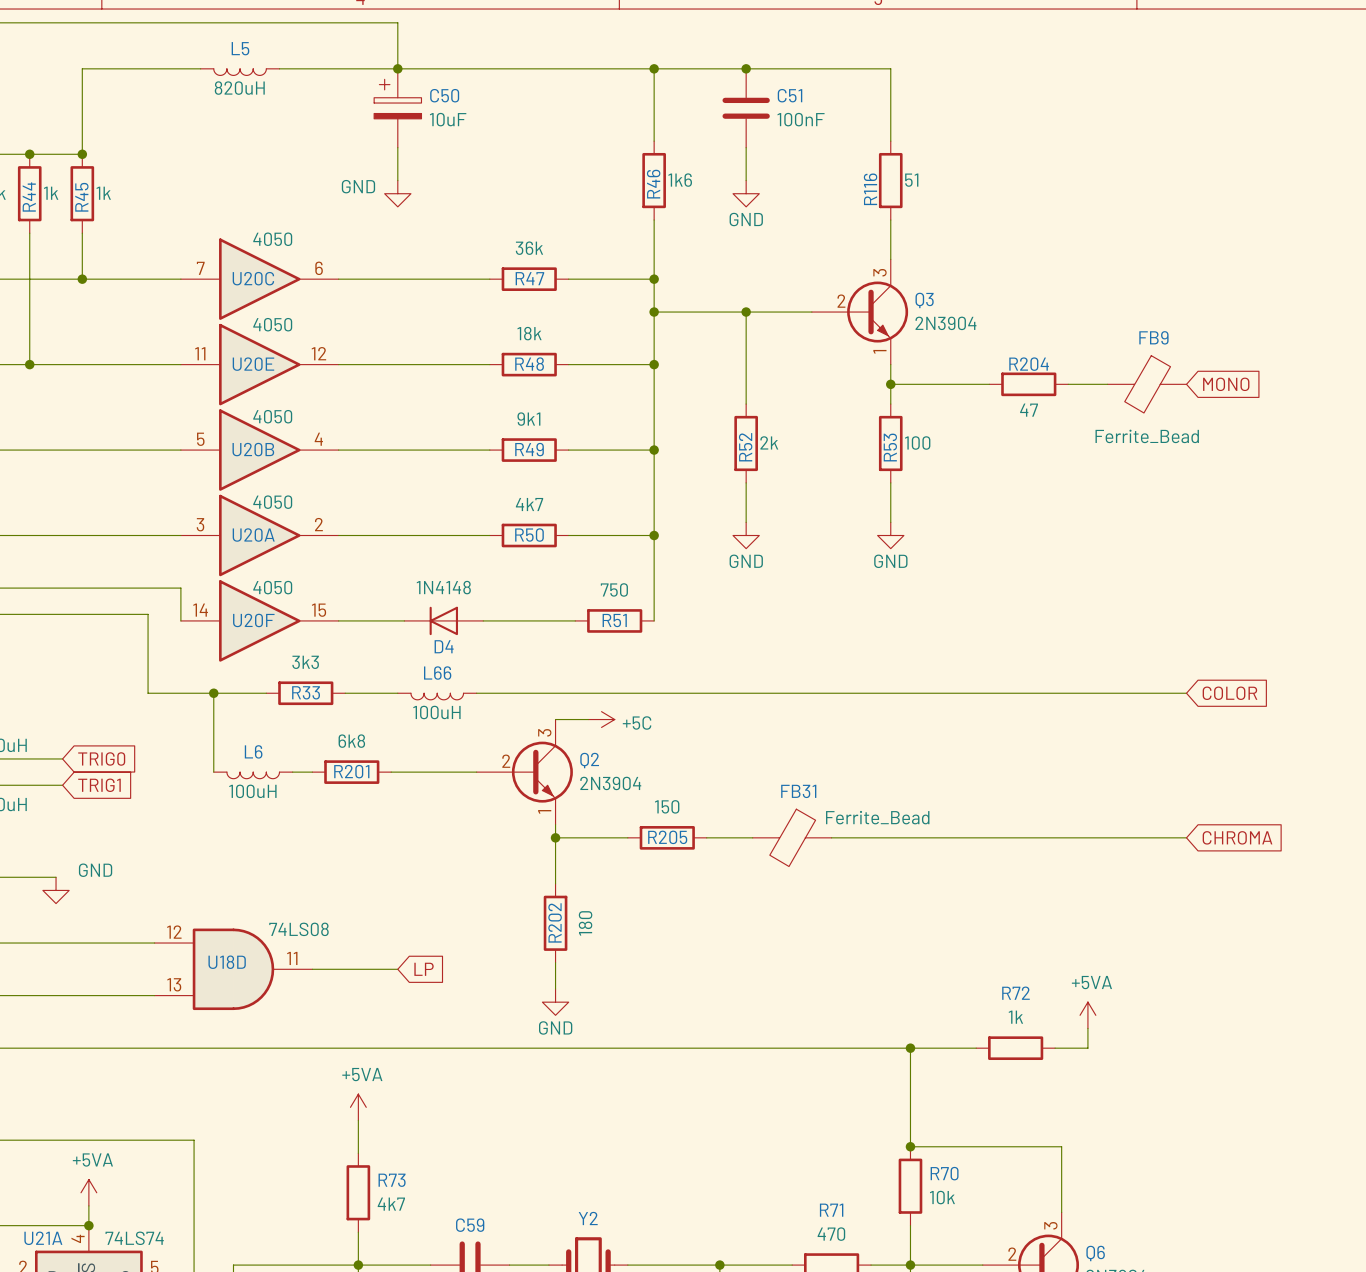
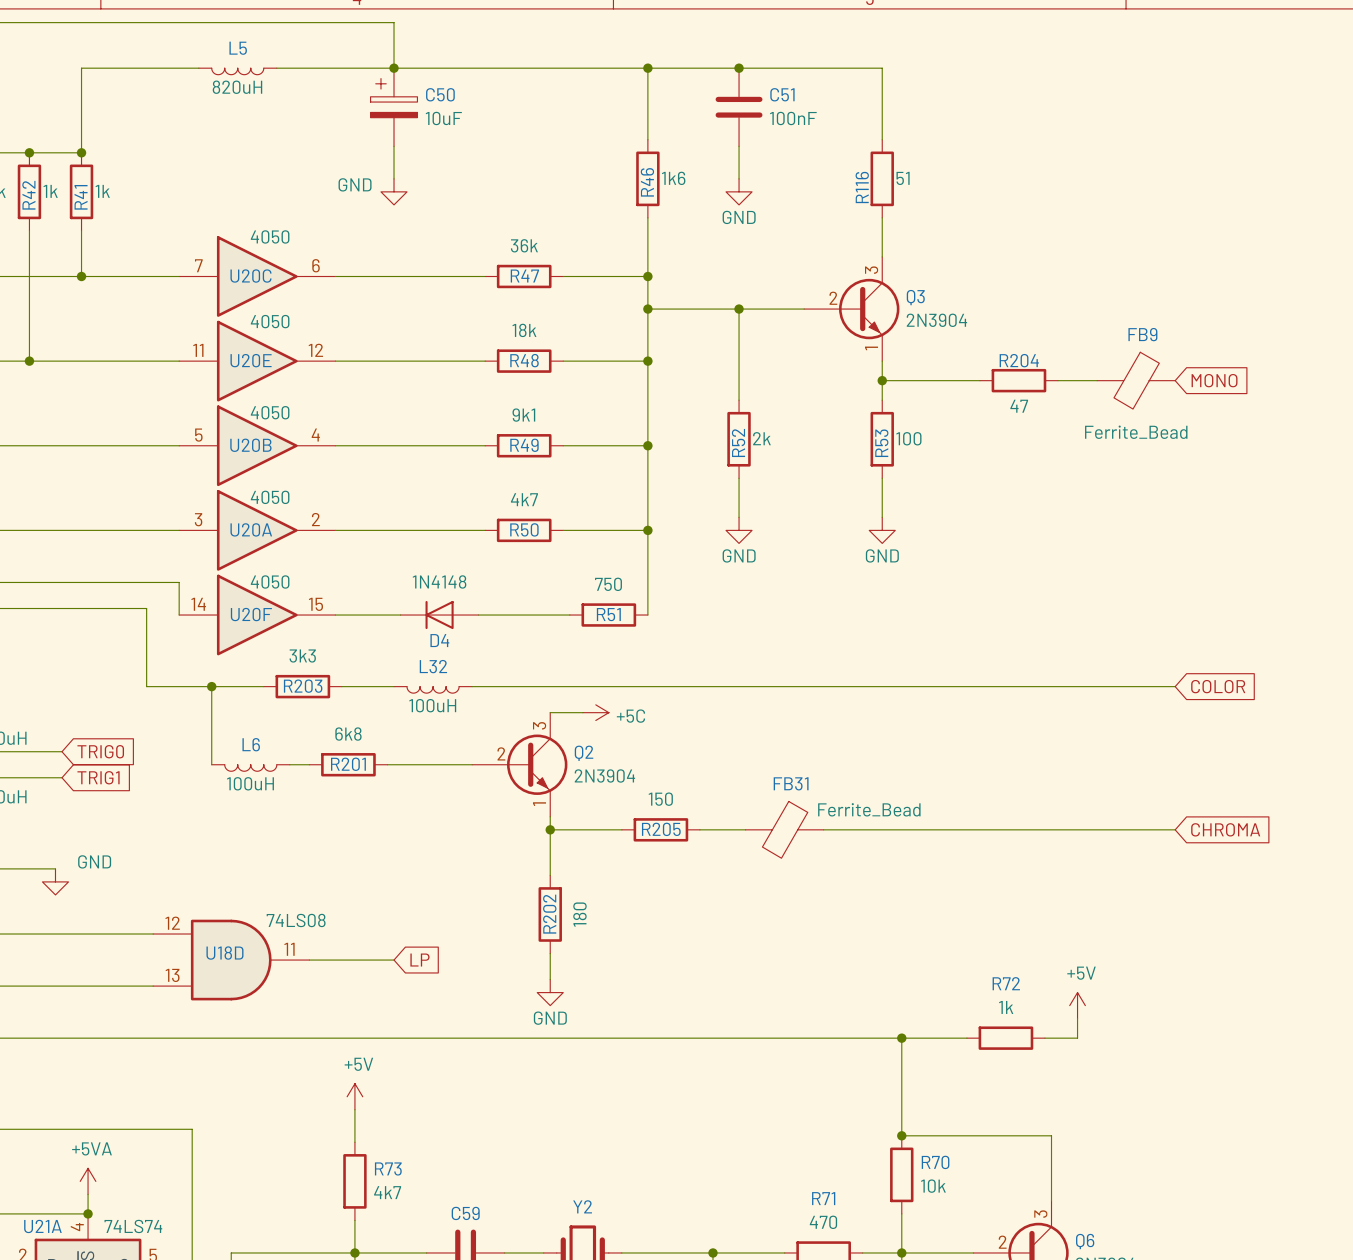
R44 name: R44 (29, 197) -> R42 (28, 195)
R45 name: R45 (81, 197) -> R41 (81, 197)
L66 name: L66 (437, 673) -> L32 (433, 666)
R33 name: R33 (306, 692) -> R203 (303, 686)
power symbol: +5VA (1087, 1015) -> +5V (1077, 1005)
power symbol: +5VA (358, 1107) -> +5V (354, 1096)

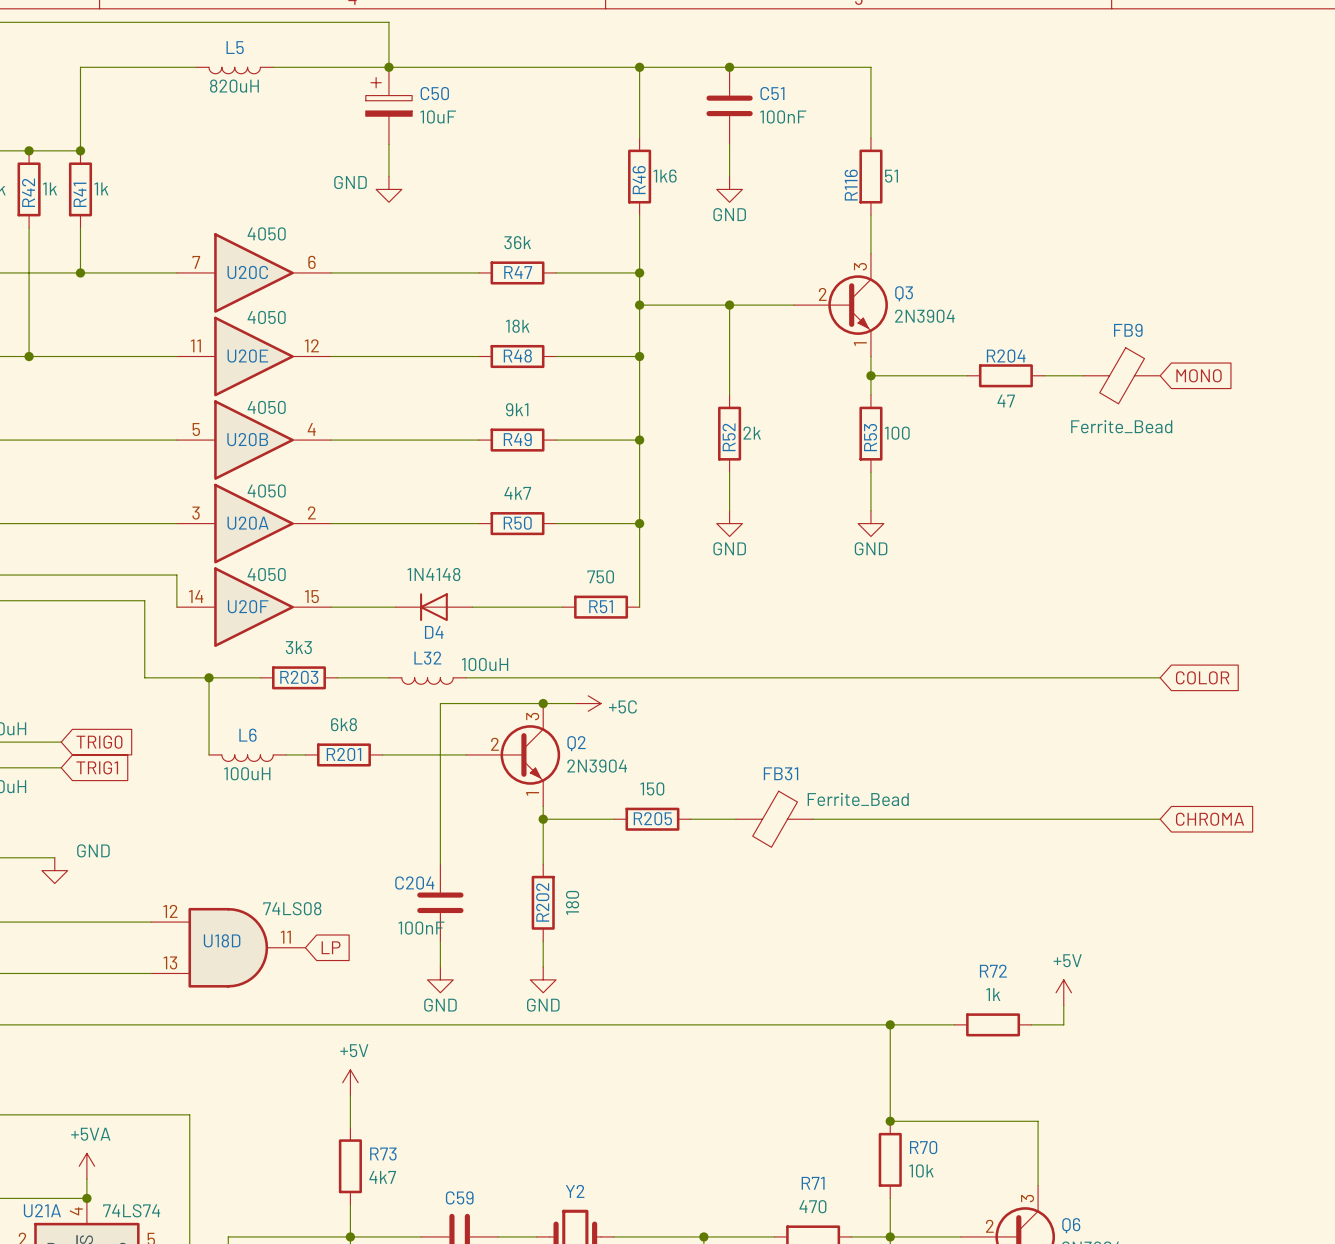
L32 value position: 100uH (432, 705) -> 100uH (485, 664)
wire: none -> (543, 703) (440, 703) (440, 864)
junction: none -> (543, 703)
C204: none -> 100nF (440, 902)
wire: none -> (440, 941) (440, 967)
wire: (309, 960) (394, 960) -> none
global label position: LP (419, 960) -> LP (331, 947)
power symbol: none -> GND (440, 979)

